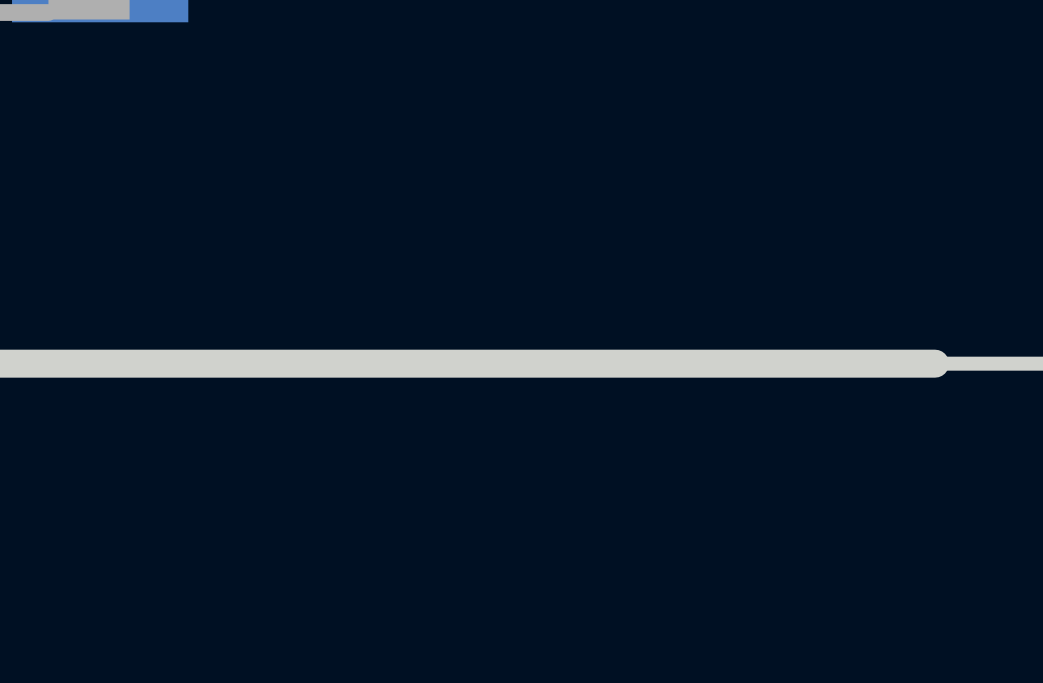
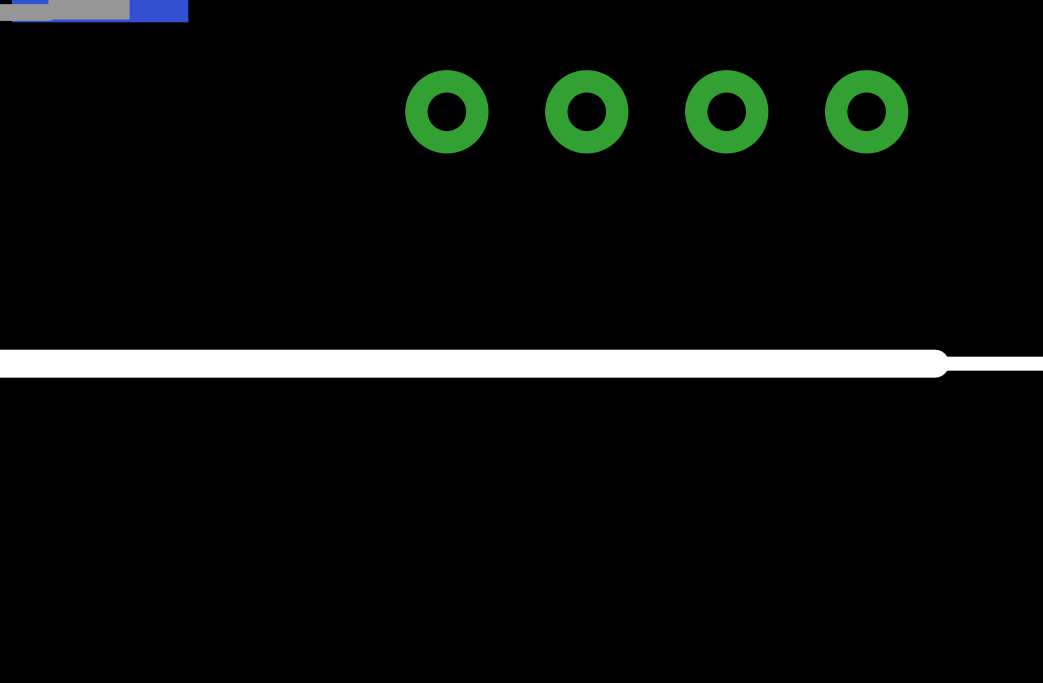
via: none -> (446, 111)
via: none -> (586, 111)
via: none -> (726, 111)
via: none -> (866, 111)

